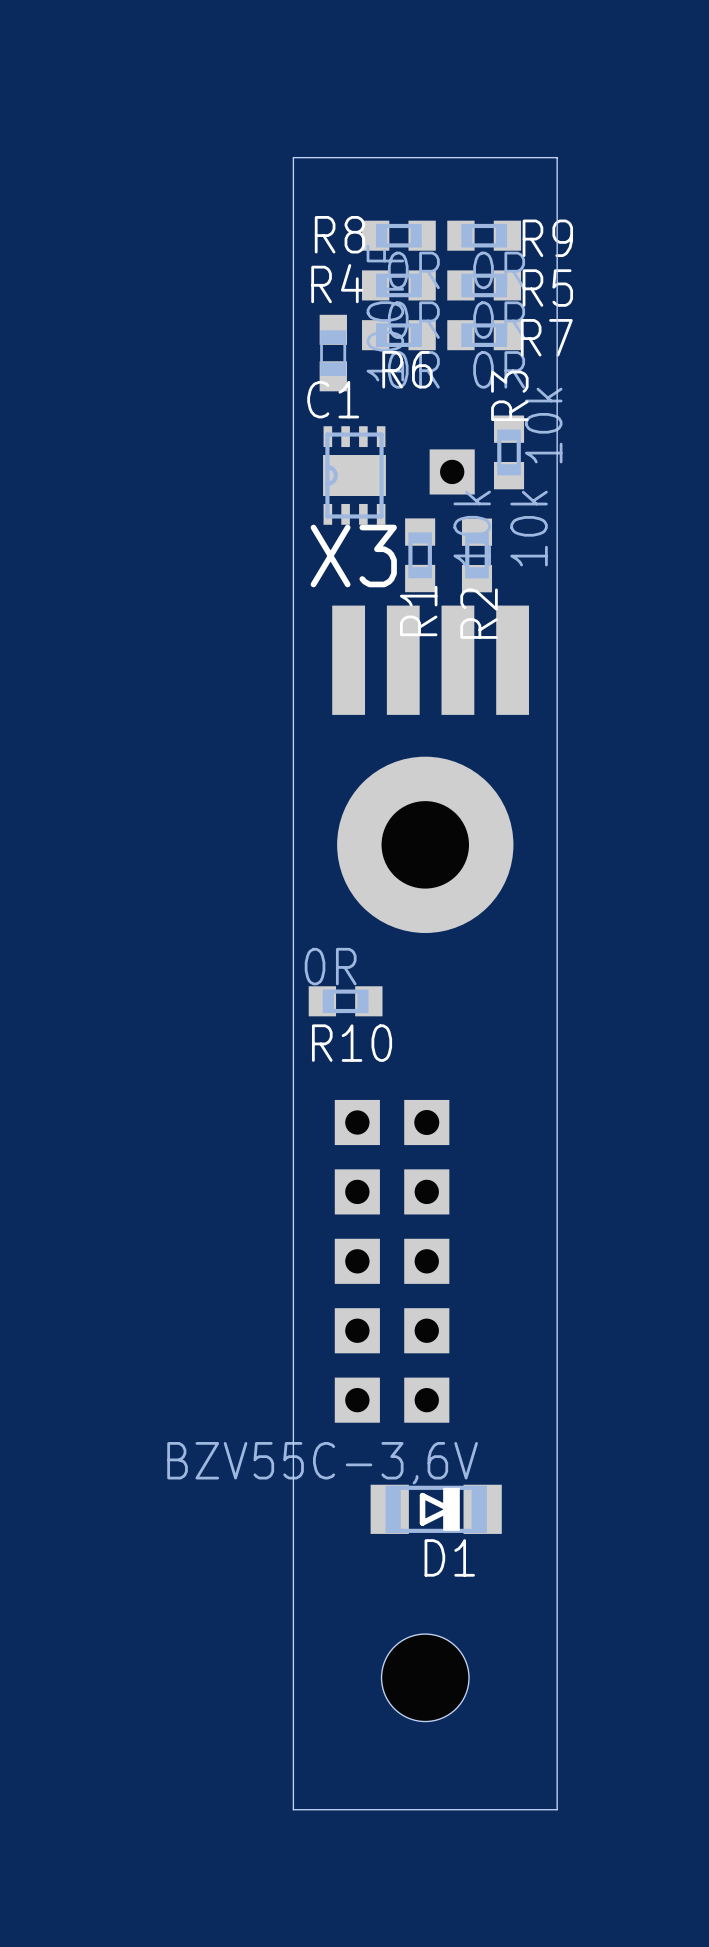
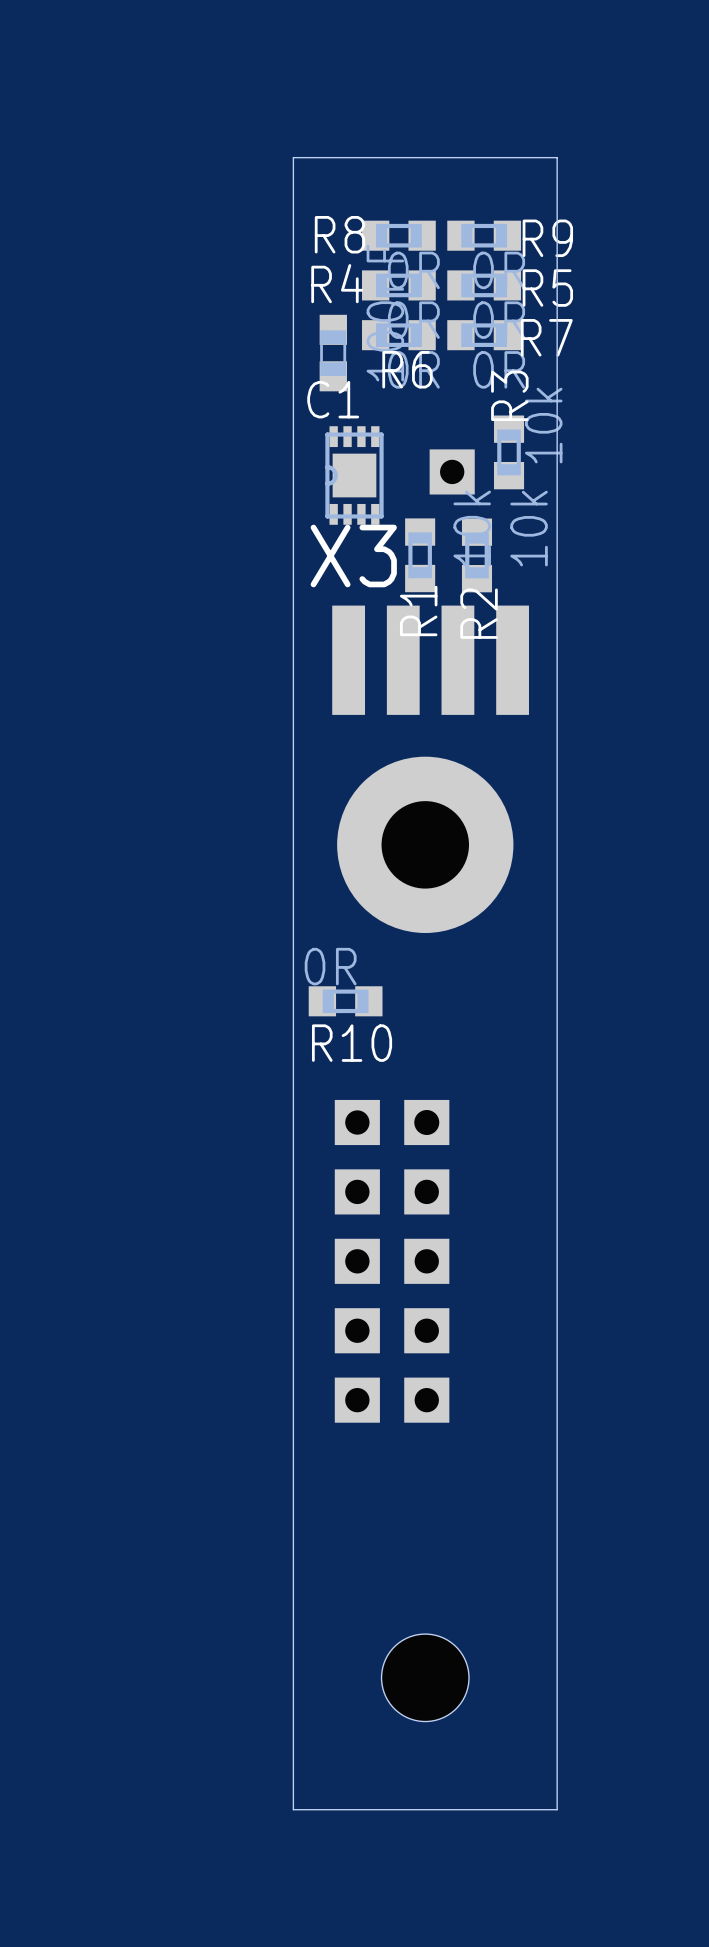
X3 footprint: [323, 426, 386, 525] -> [325, 426, 384, 525]
D1: BZV55C-3,6V (436, 1509) -> none

